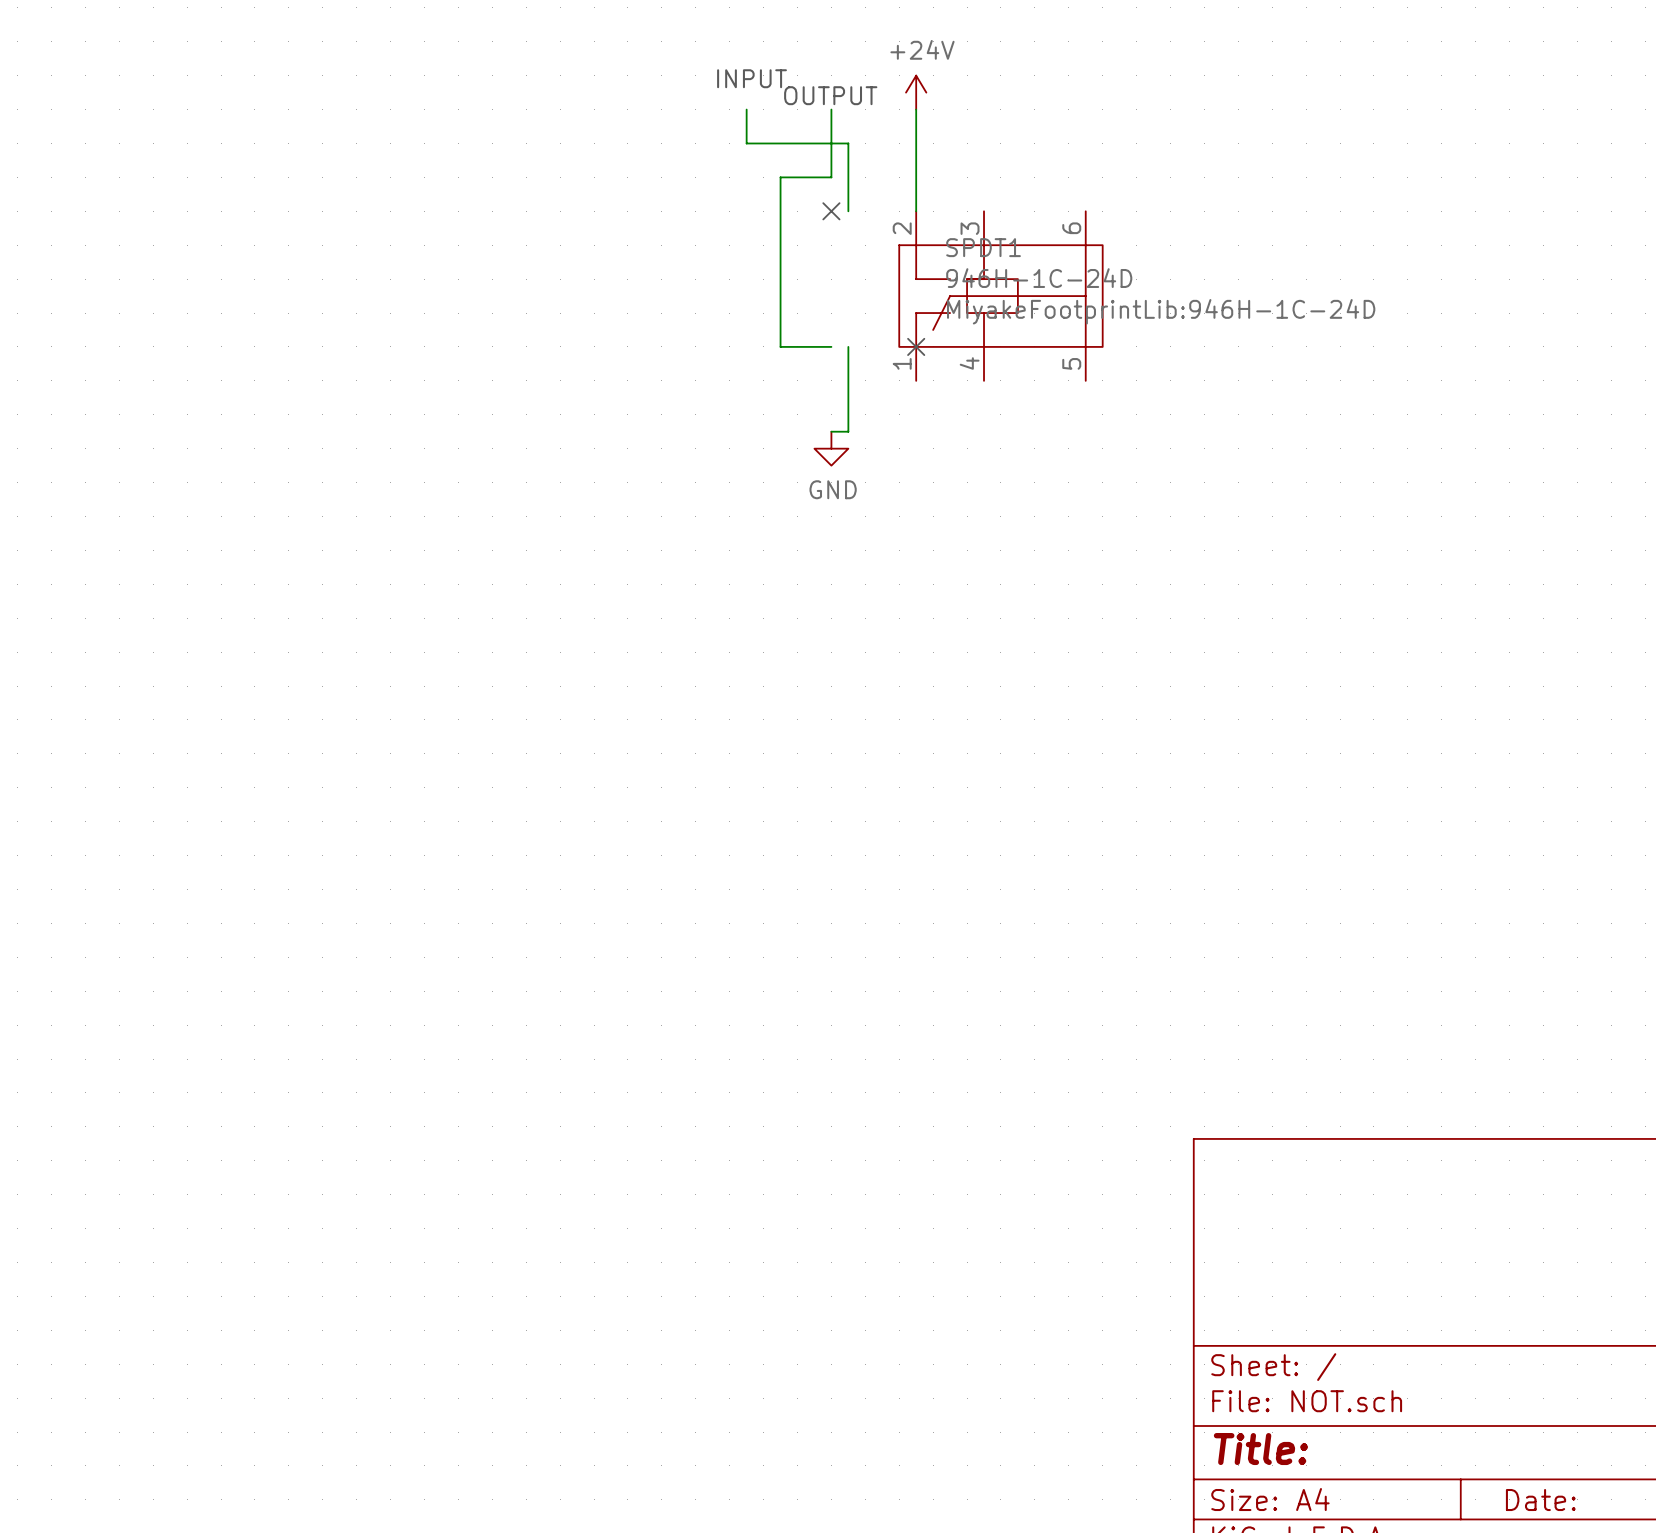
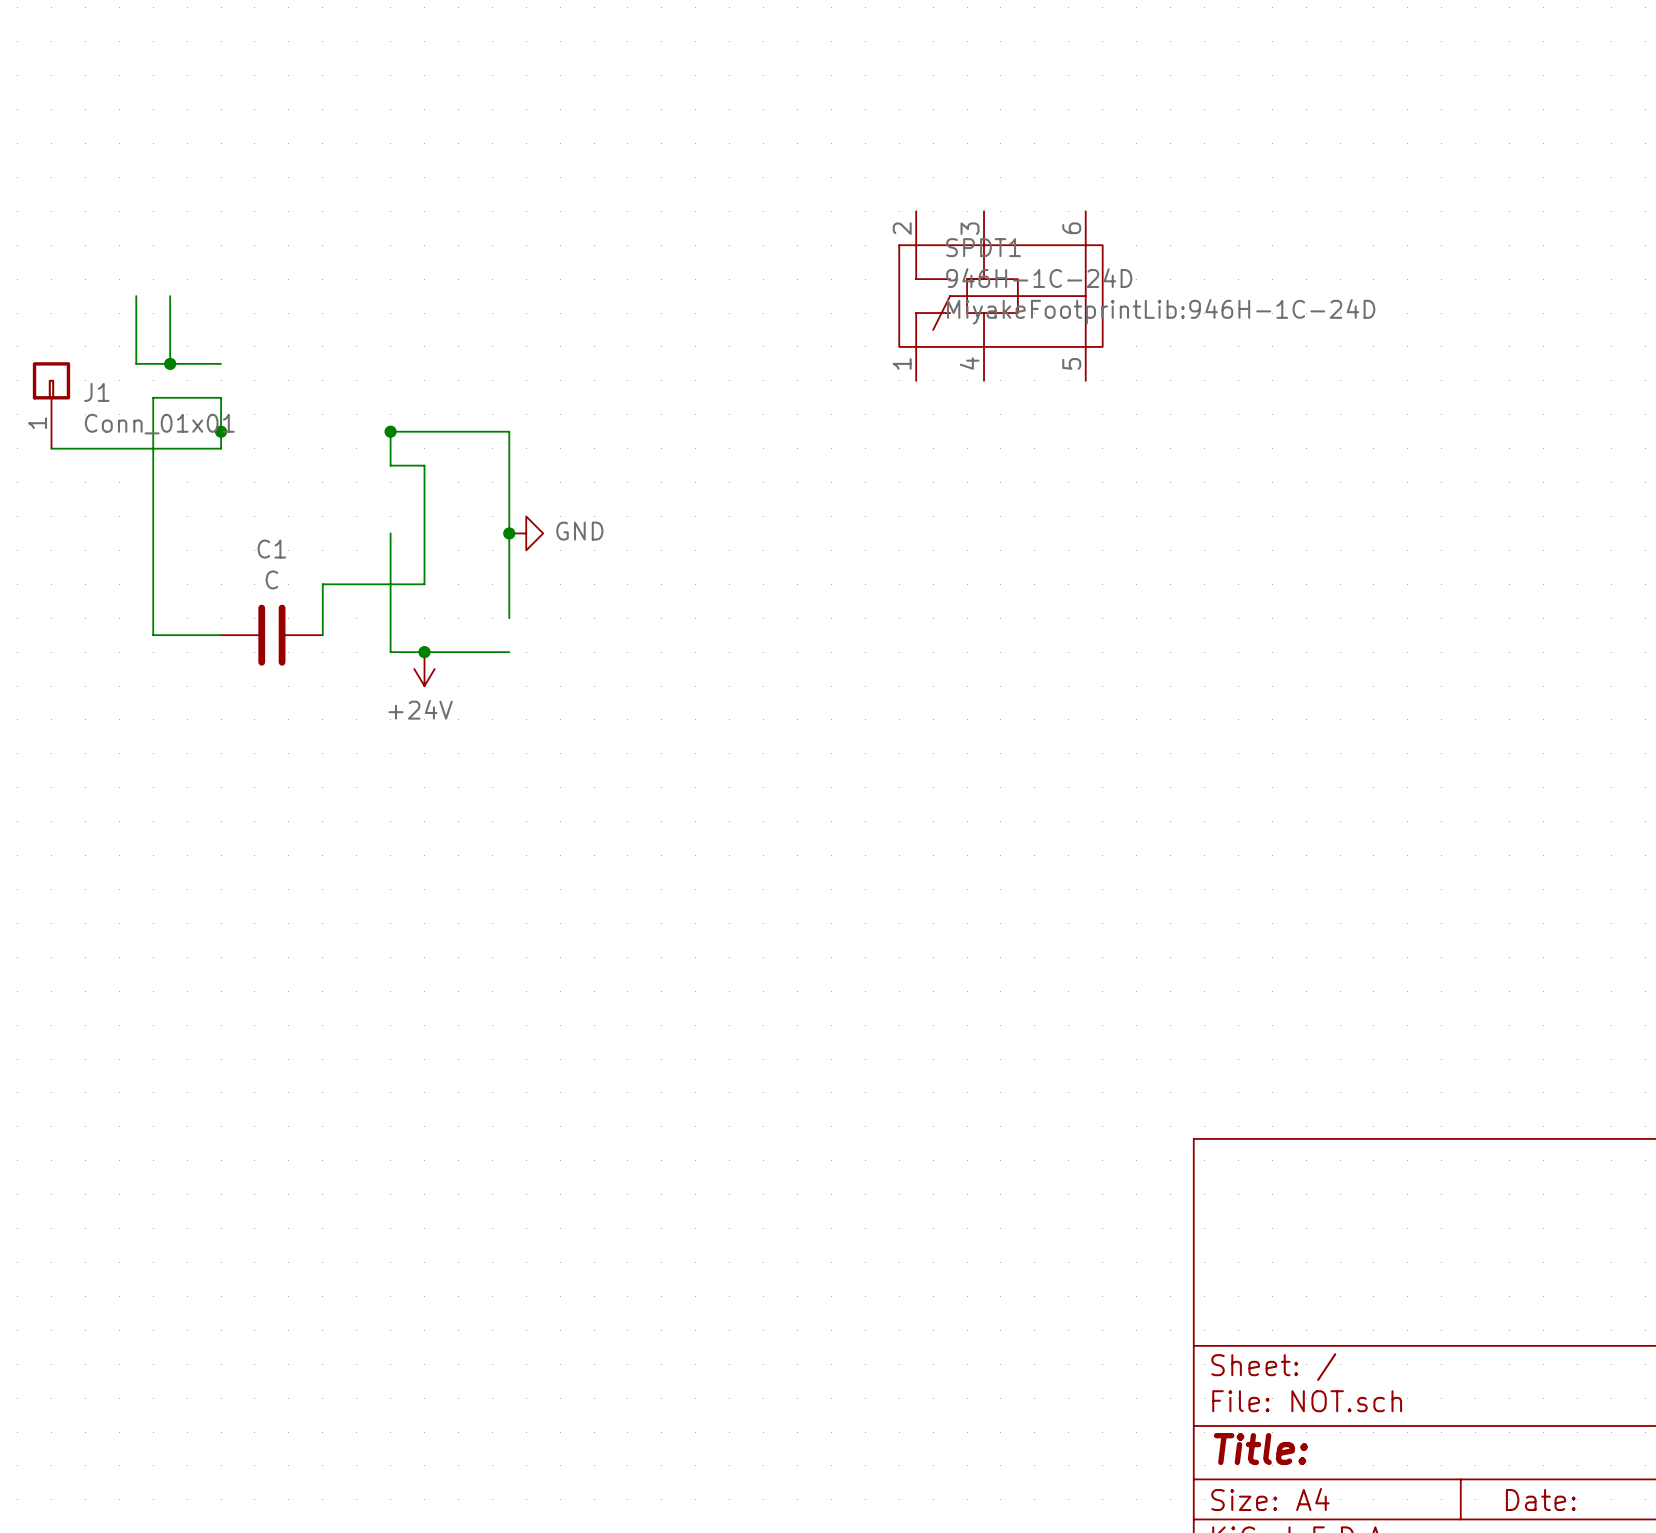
text: INPUT (752, 78) -> none
power symbol: +24V (916, 92) -> none
text: OUTPUT (830, 95) -> none
wire: (746, 109) (746, 143) (848, 143) (848, 211) -> none
wire: (831, 109) (831, 177) (780, 177) (780, 346) (831, 346) -> none
wire: (916, 109) (916, 211) -> none
no-connect mark: (831, 211) -> none
wire: none -> (136, 296) (136, 363) (221, 363)
wire: none -> (170, 296) (170, 363)
wire: (848, 346) (848, 431) (831, 431) -> none
no-connect mark: (916, 346) -> none
junction: none -> (170, 363)
J1: none -> Conn_01x01 (51, 405)
junction: none -> (221, 431)
junction: none -> (390, 431)
wire: none -> (51, 448) (221, 448) (221, 397) (153, 397) (153, 635) (221, 635)
power symbol rotation: 0° (831, 448) -> 90° counterclockwise (526, 533)
power symbol position: GND (831, 448) -> GND (526, 533)
wire: none -> (390, 533) (390, 652) (509, 652)
junction: none -> (509, 533)
wire: none -> (509, 618) (509, 431) (390, 431) (390, 465) (424, 465) (424, 584) (322, 584) (322, 635)
C1: none -> C (271, 635)
junction: none -> (424, 652)
power symbol: none -> +24V (424, 669)

